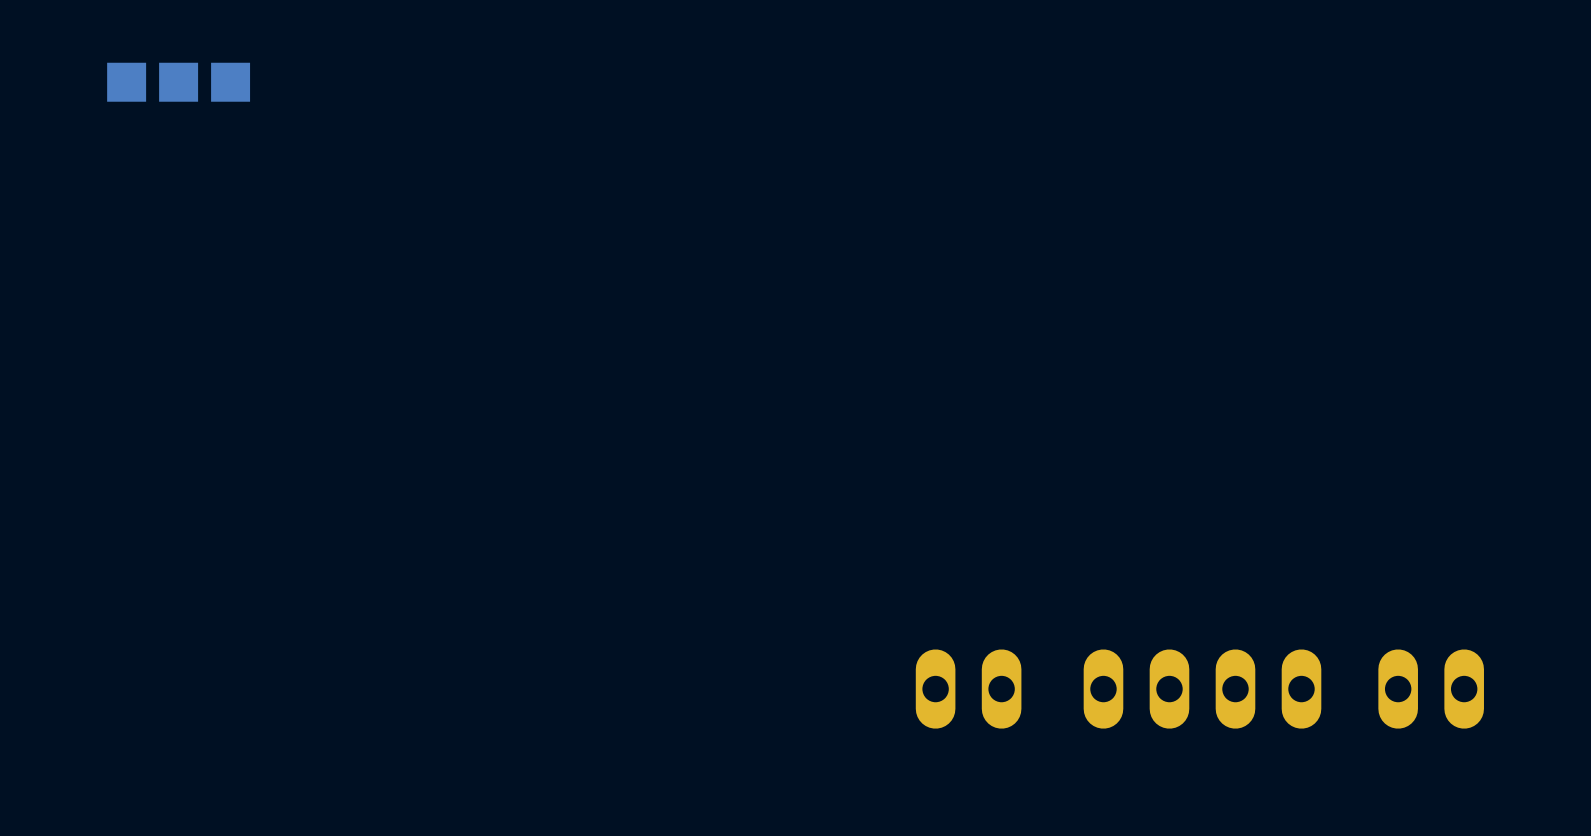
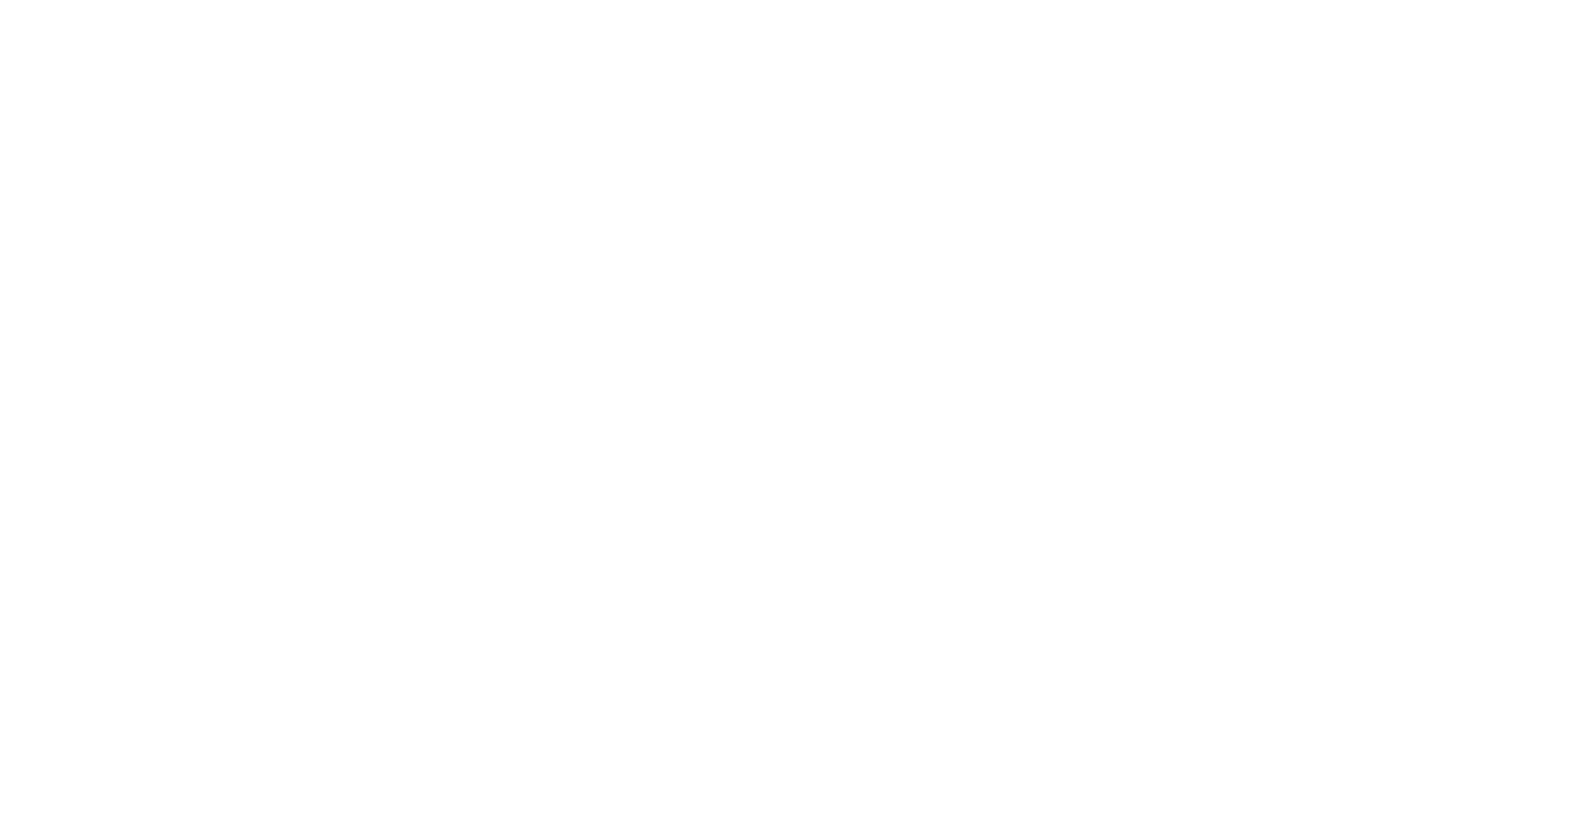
part: (178, 82) -> none
part: (968, 689) -> none
part: (1202, 689) -> none
part: (1431, 689) -> none

